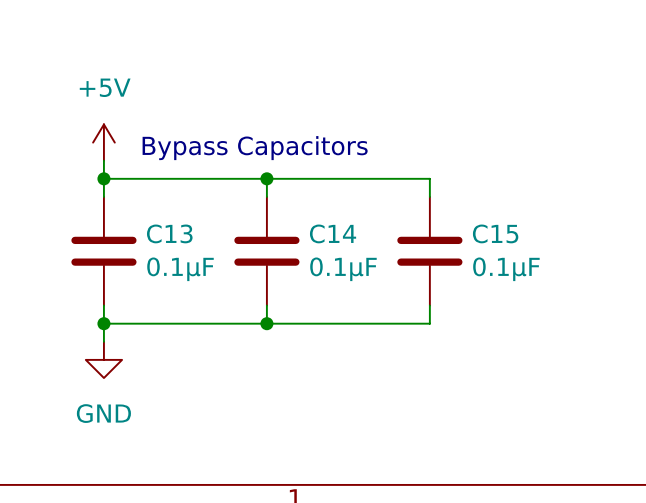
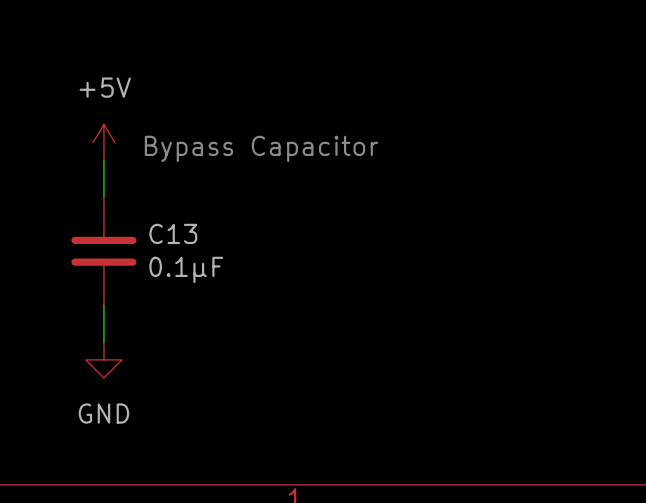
text: Bypass Capacitors (255, 148) -> Bypass Capacitor (261, 148)
wire: (103, 178) (429, 178) (429, 196) -> none
junction: (103, 178) -> none
wire: (266, 178) (266, 196) -> none
junction: (266, 178) -> none
C14: 0.1µF (266, 251) -> none
C15: 0.1µF (429, 251) -> none
wire: (266, 305) (266, 323) -> none
wire: (429, 305) (429, 323) (103, 323) -> none
junction: (103, 323) -> none
junction: (266, 323) -> none

